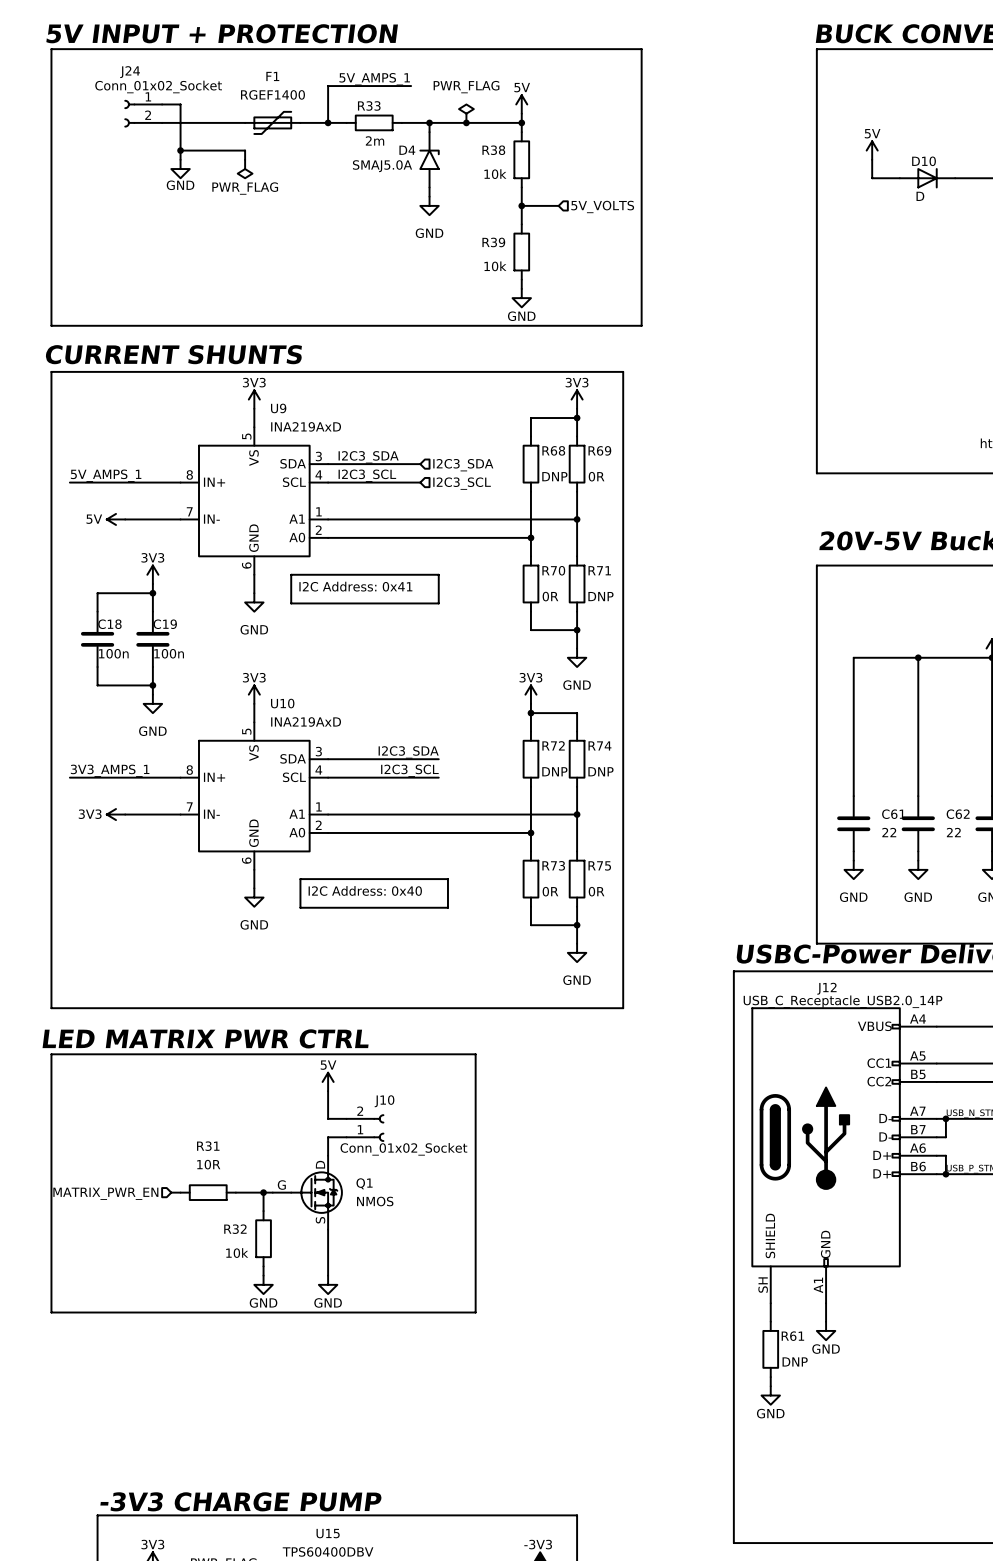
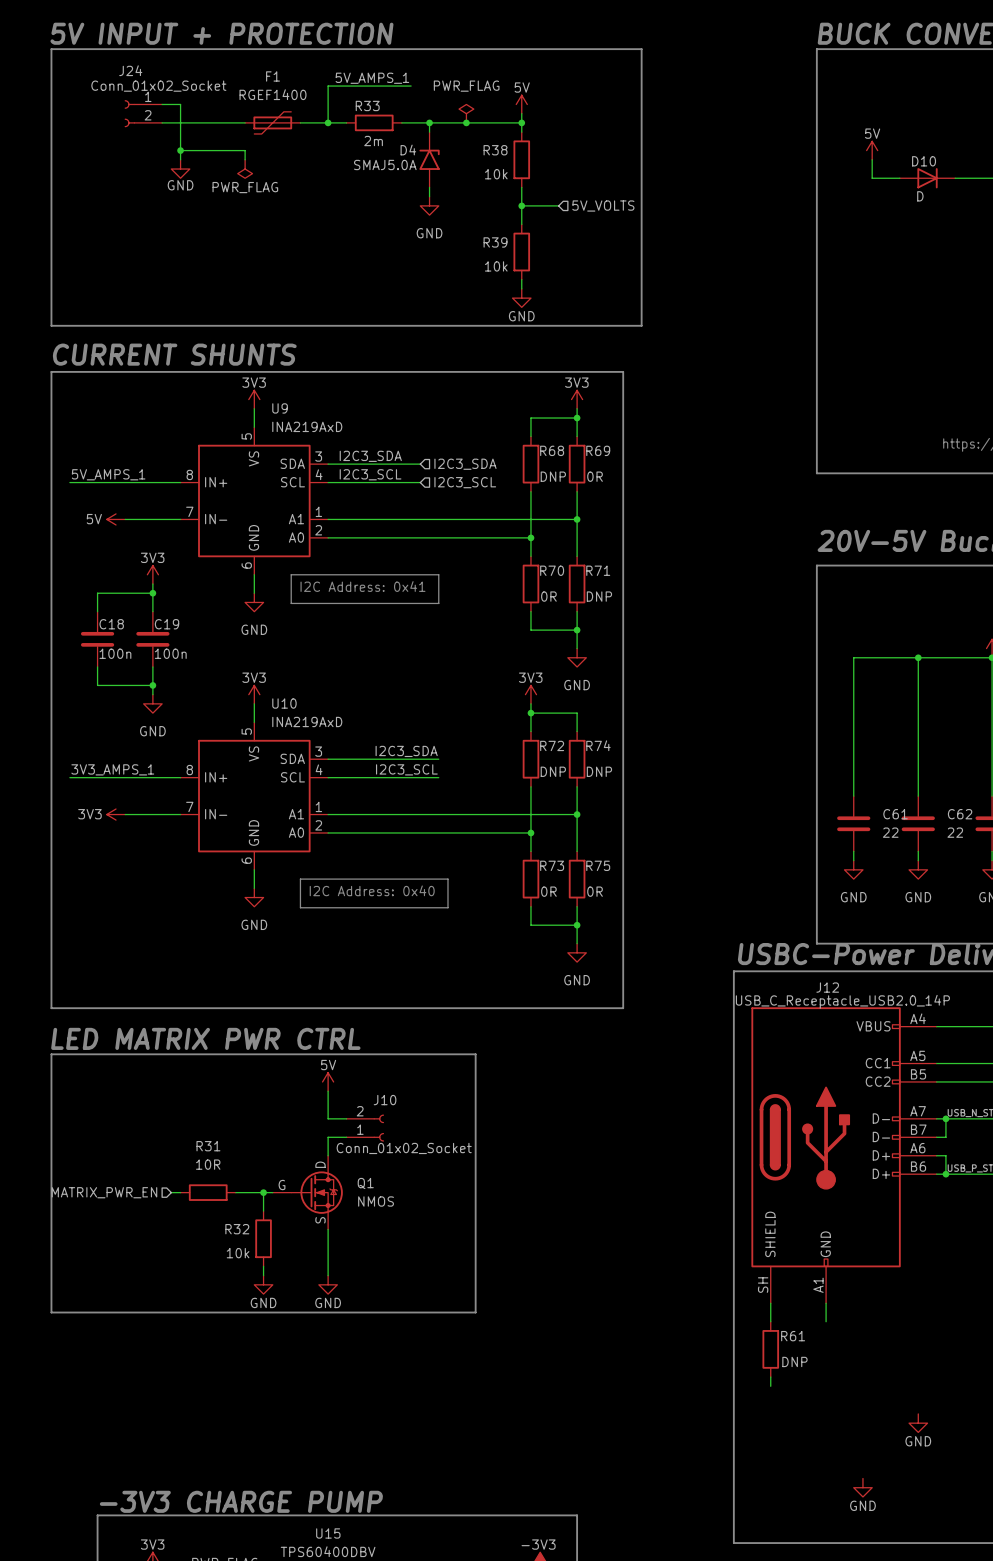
power symbol: GND (826, 1330) -> none
power symbol: GND (770, 1395) -> none
power symbol: none -> GND (918, 1423)
power symbol: none -> GND (862, 1487)

